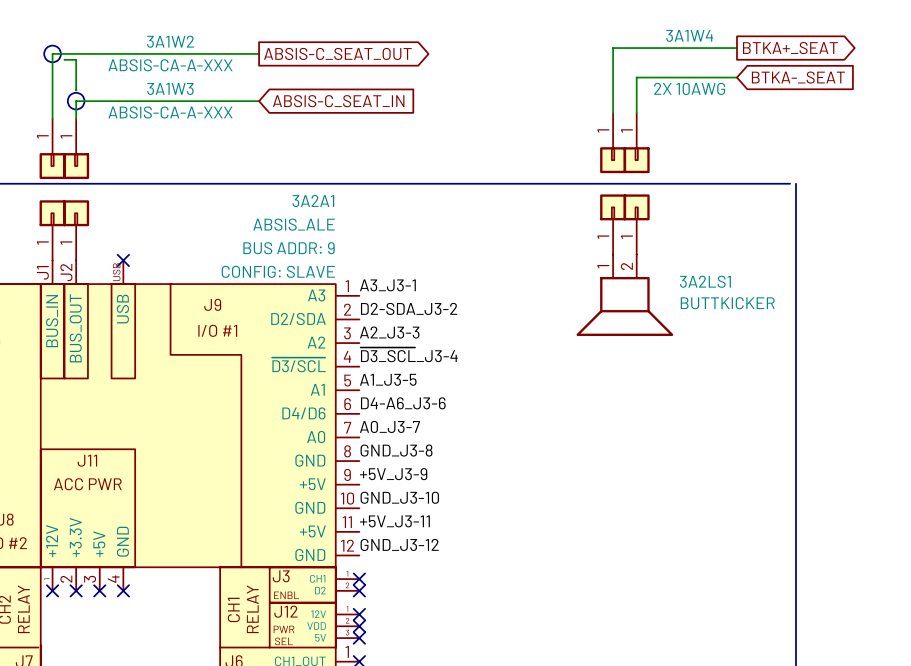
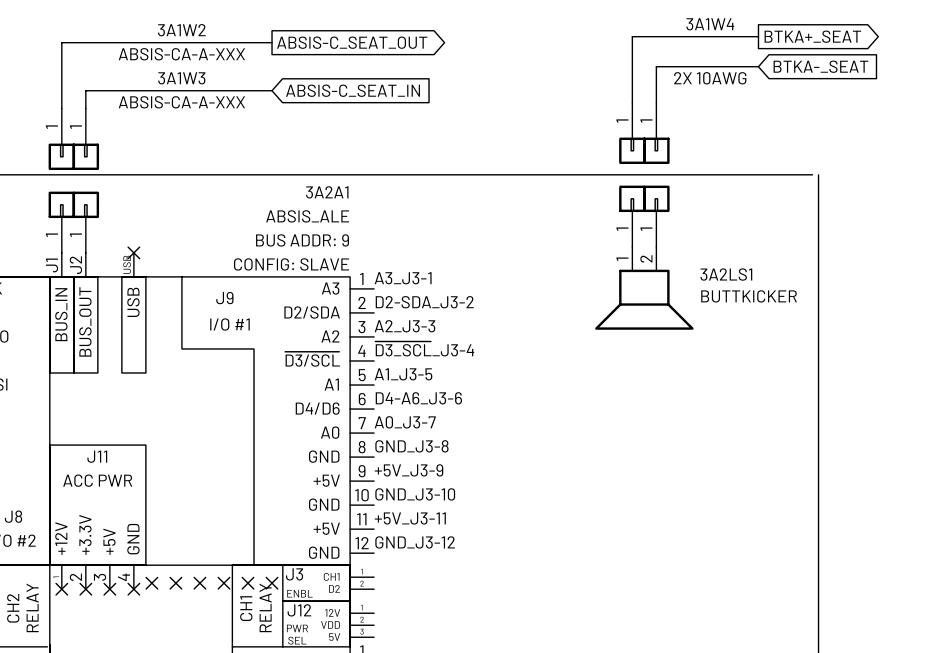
drawing: [44, 45, 61, 63] -> none
wire: (64, 59) (76, 59) (76, 90) -> none
drawing: [67, 92, 85, 110] -> none
no-connect mark: (359, 579) -> none
no-connect mark: none -> (151, 583)
no-connect mark: none -> (175, 583)
no-connect mark: none -> (199, 583)
no-connect mark: none -> (223, 583)
no-connect mark: none -> (247, 583)
no-connect mark: none -> (272, 583)
no-connect mark: (359, 590) -> none
no-connect mark: (359, 614) -> none
no-connect mark: (359, 626) -> none
no-connect mark: (359, 638) -> none

